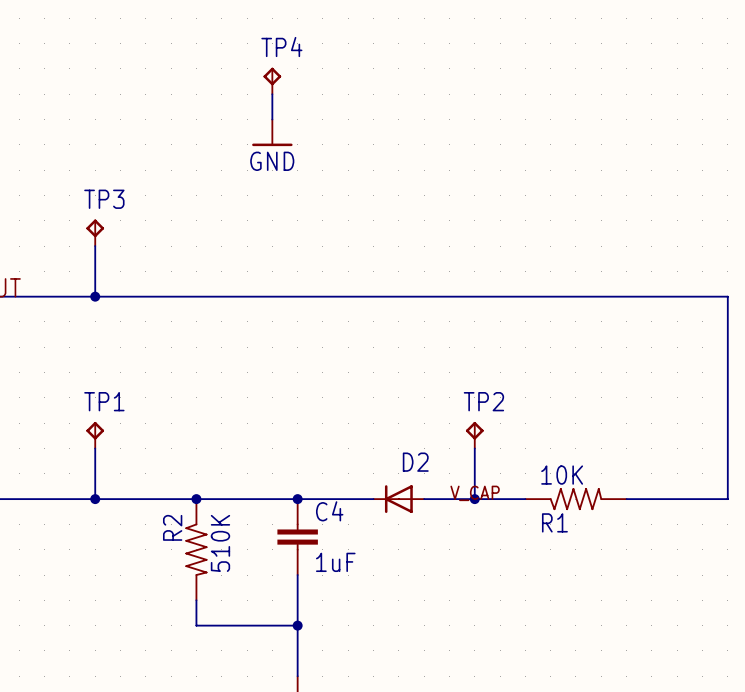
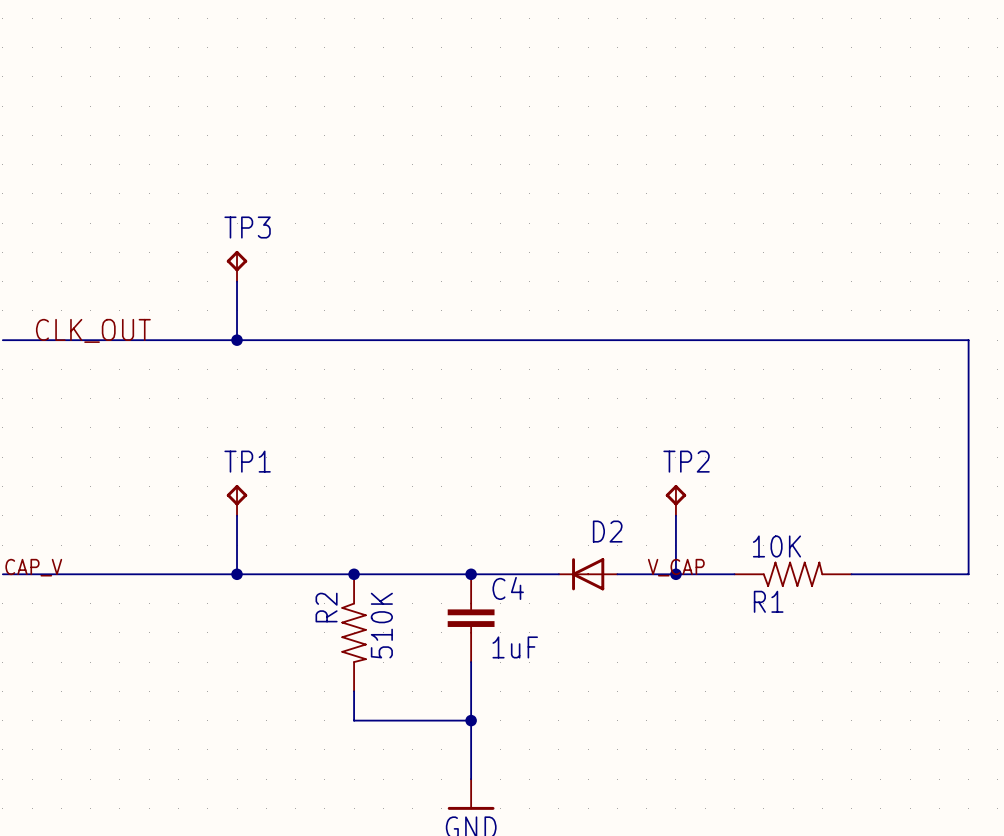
TP4: (272, 80) -> none
wire: (272, 94) (272, 119) -> none
power symbol: GND (272, 132) -> none

